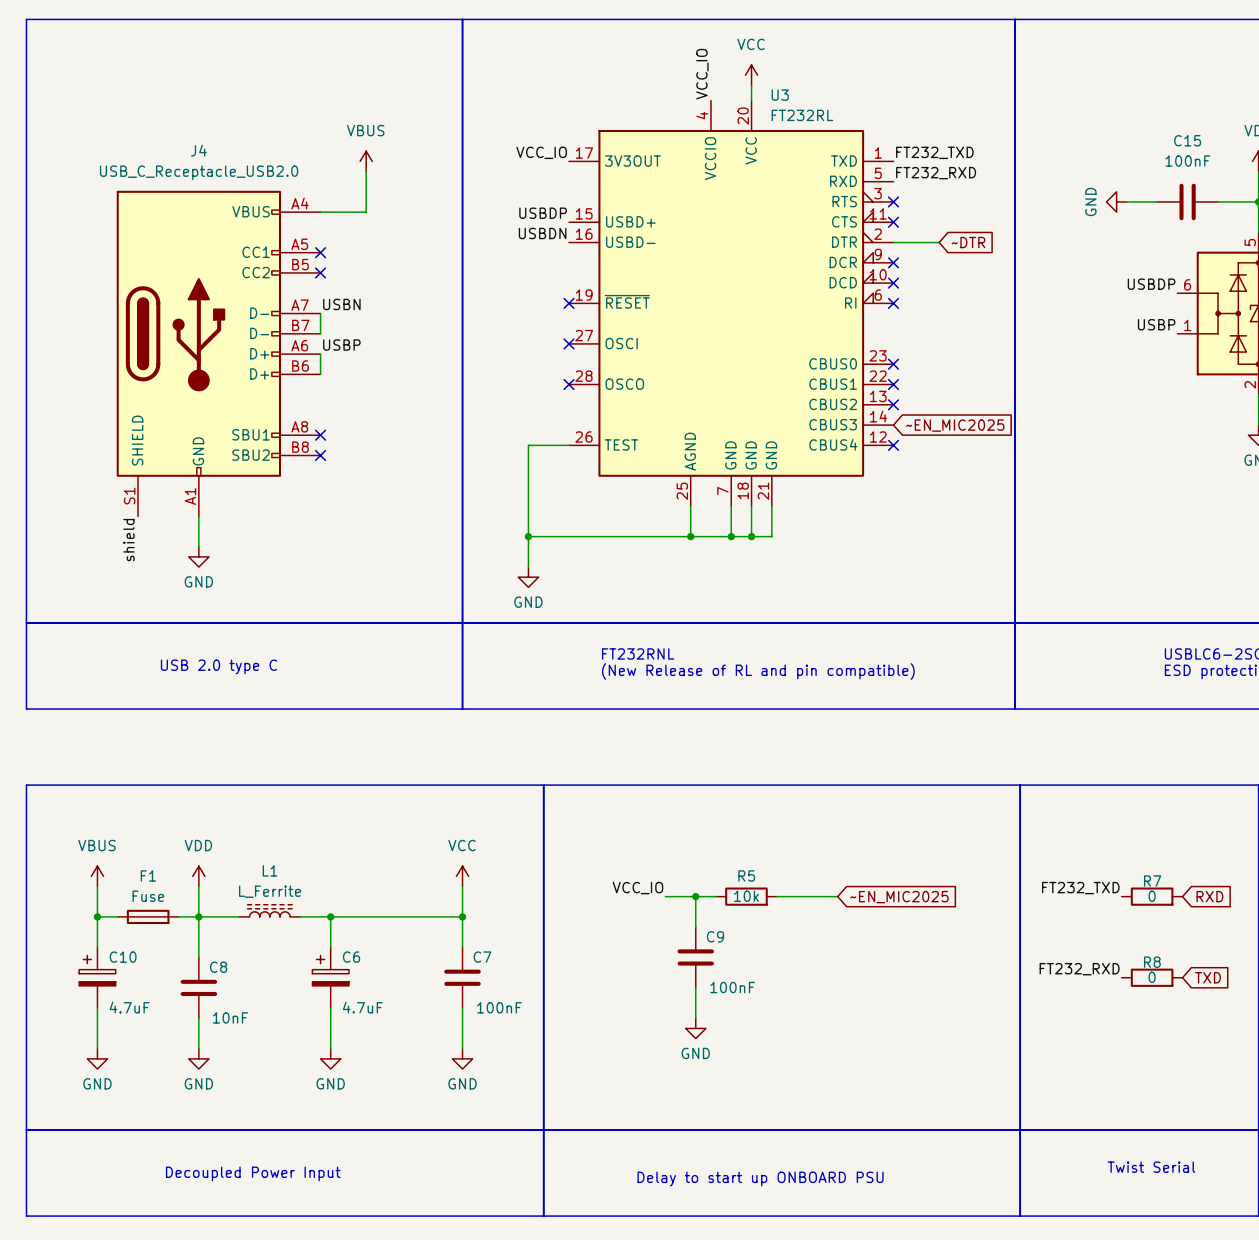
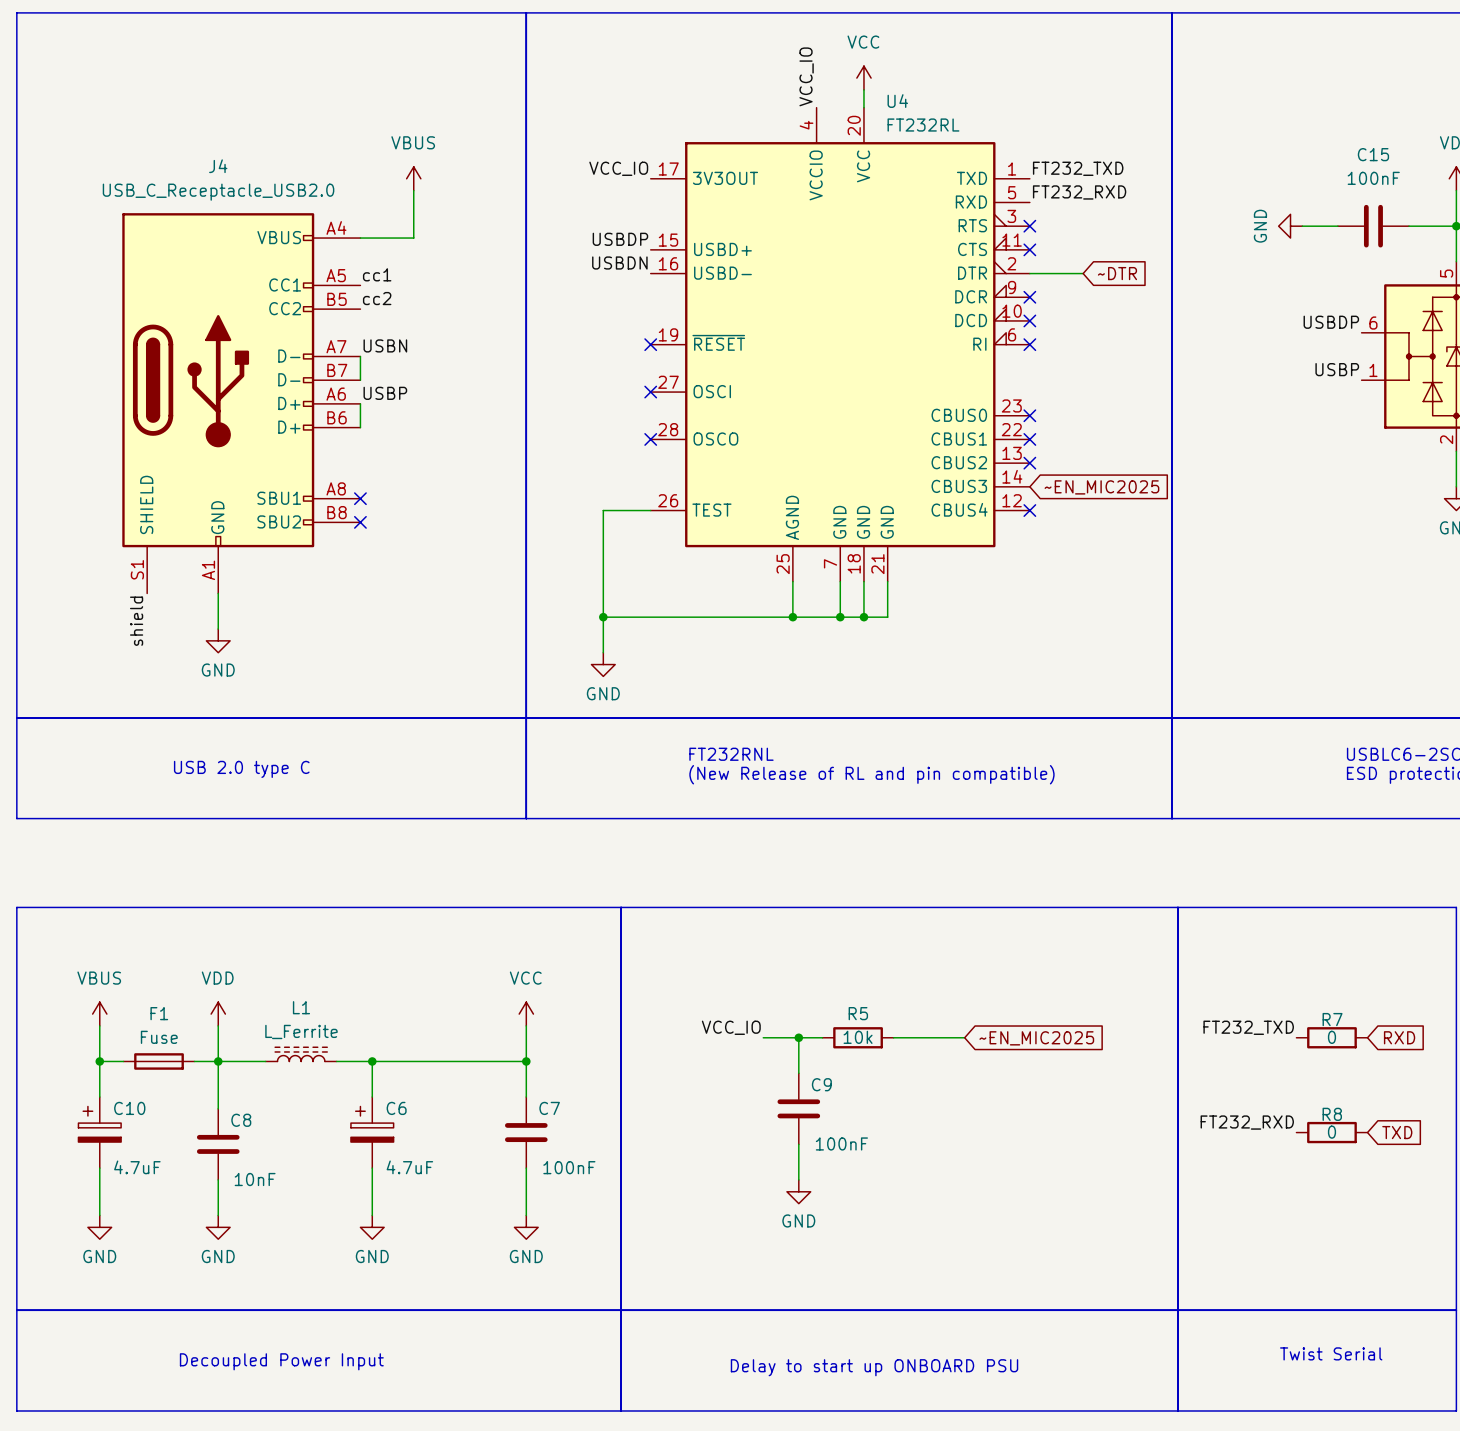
U3 name: U3 (780, 95) -> U4 (897, 101)
label: none -> cc1 (377, 274)
no-connect mark: (320, 252) -> none
label: none -> cc2 (377, 298)
no-connect mark: (320, 272) -> none

